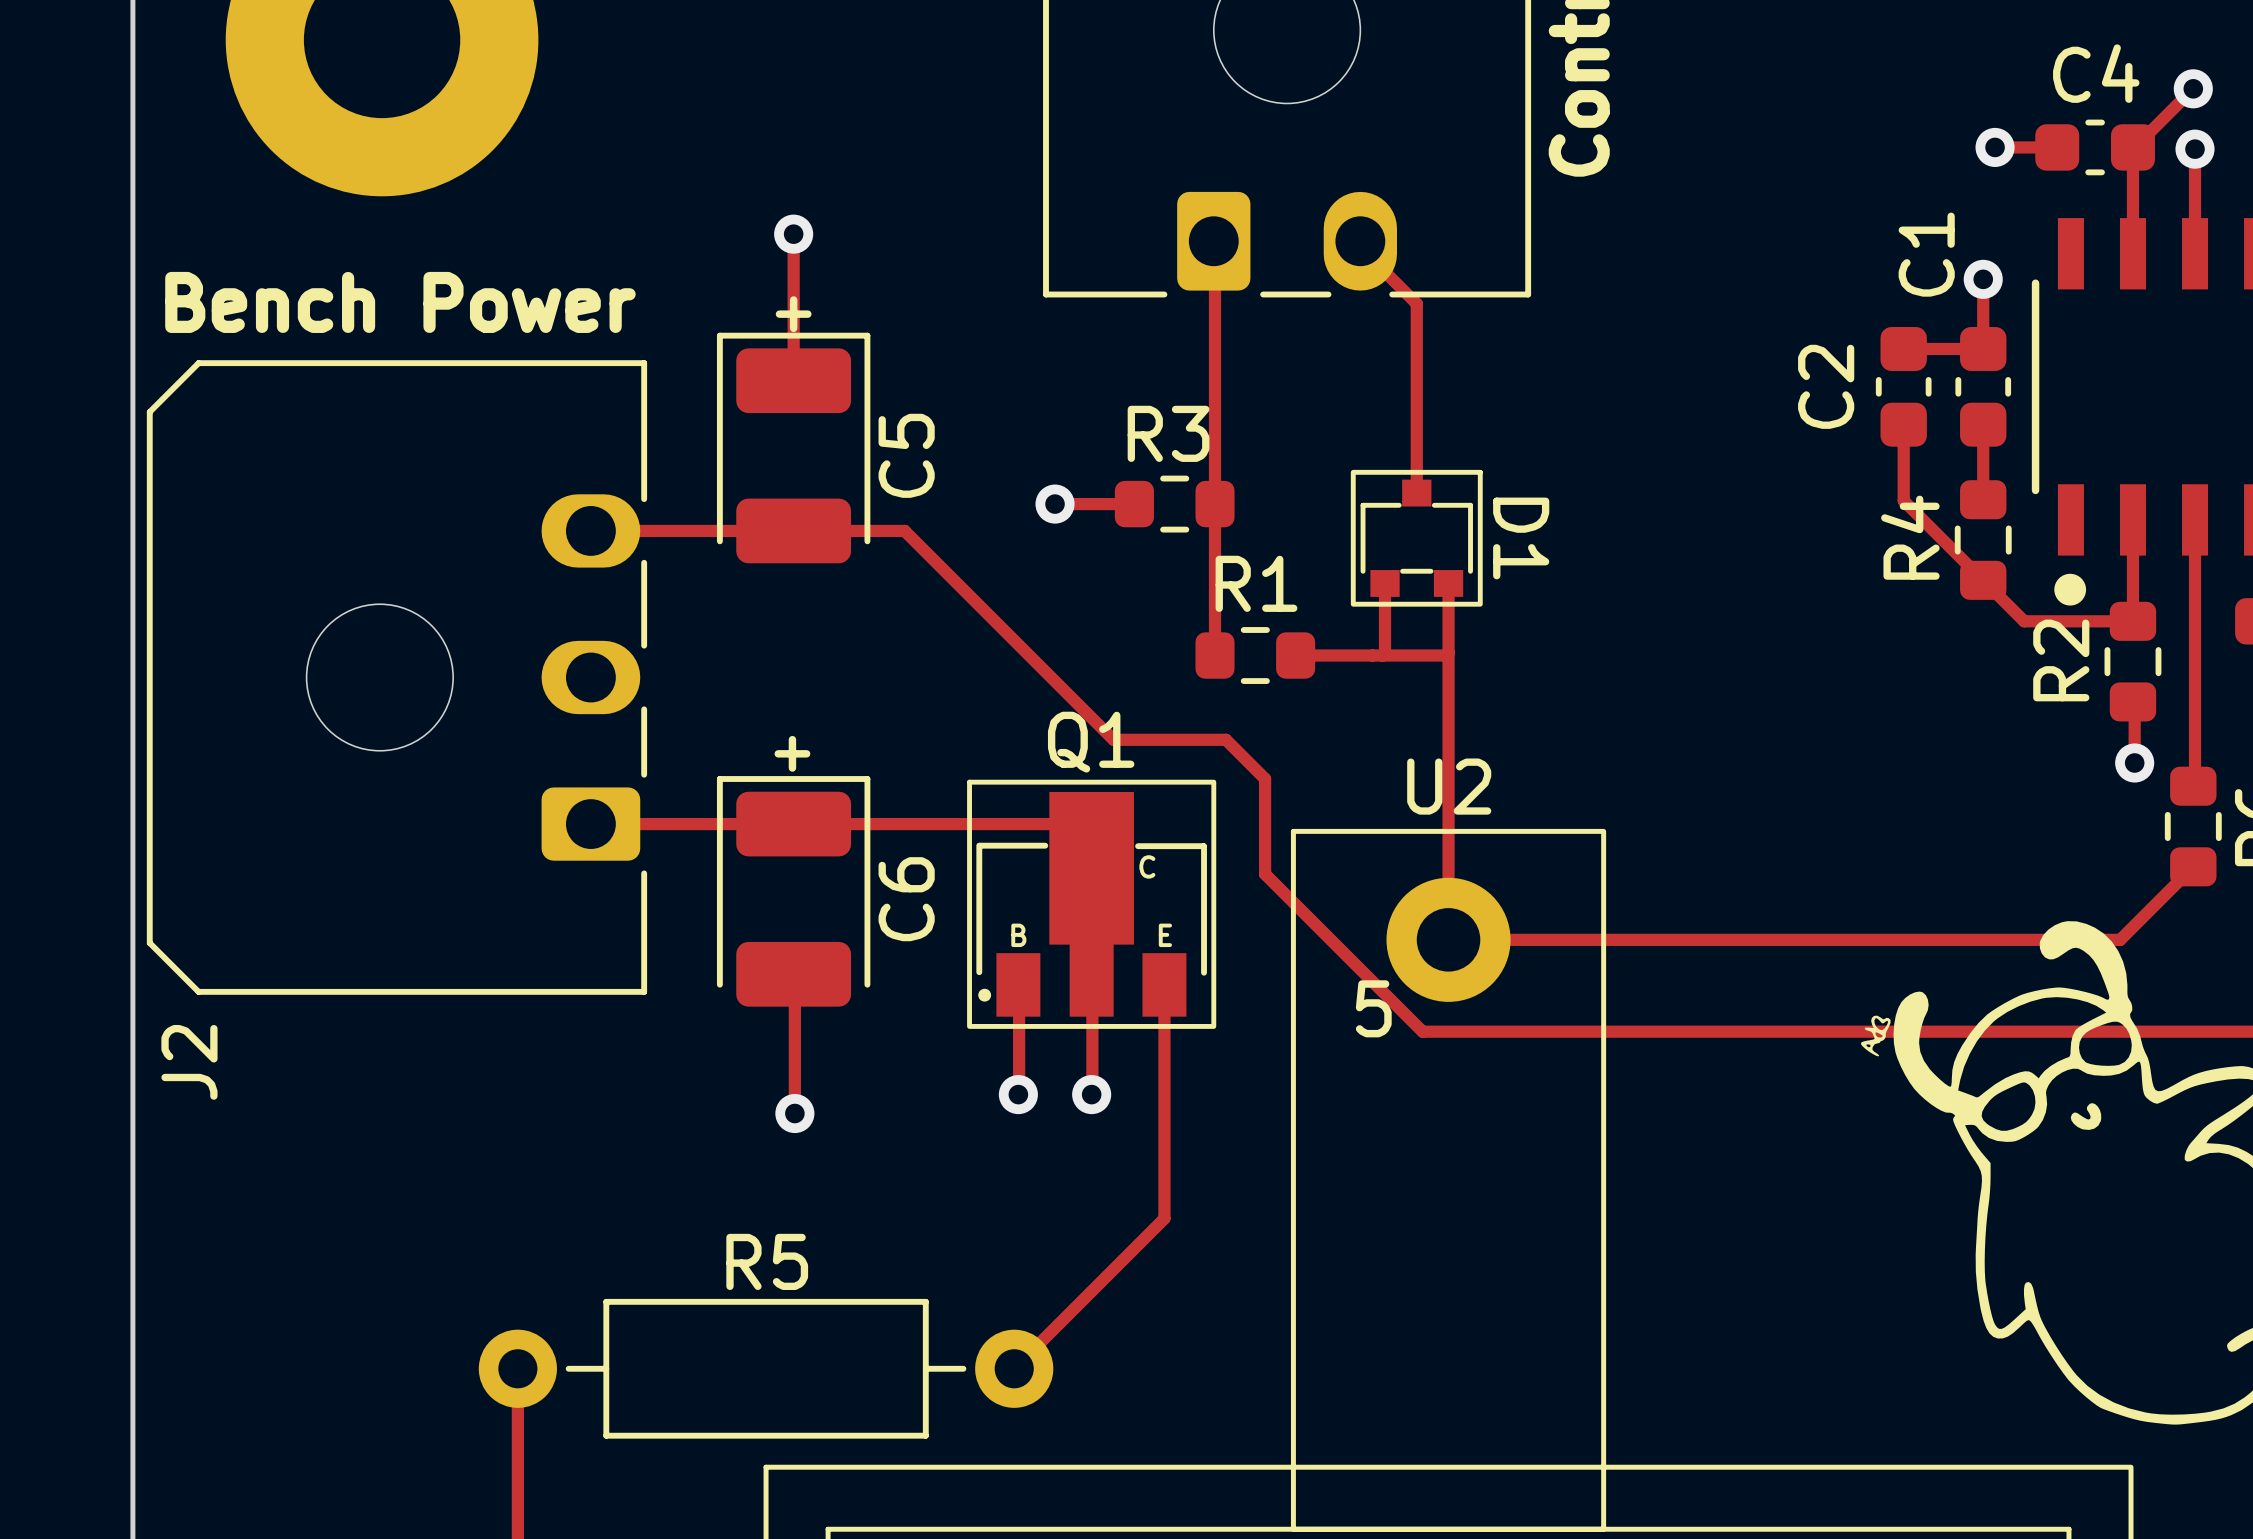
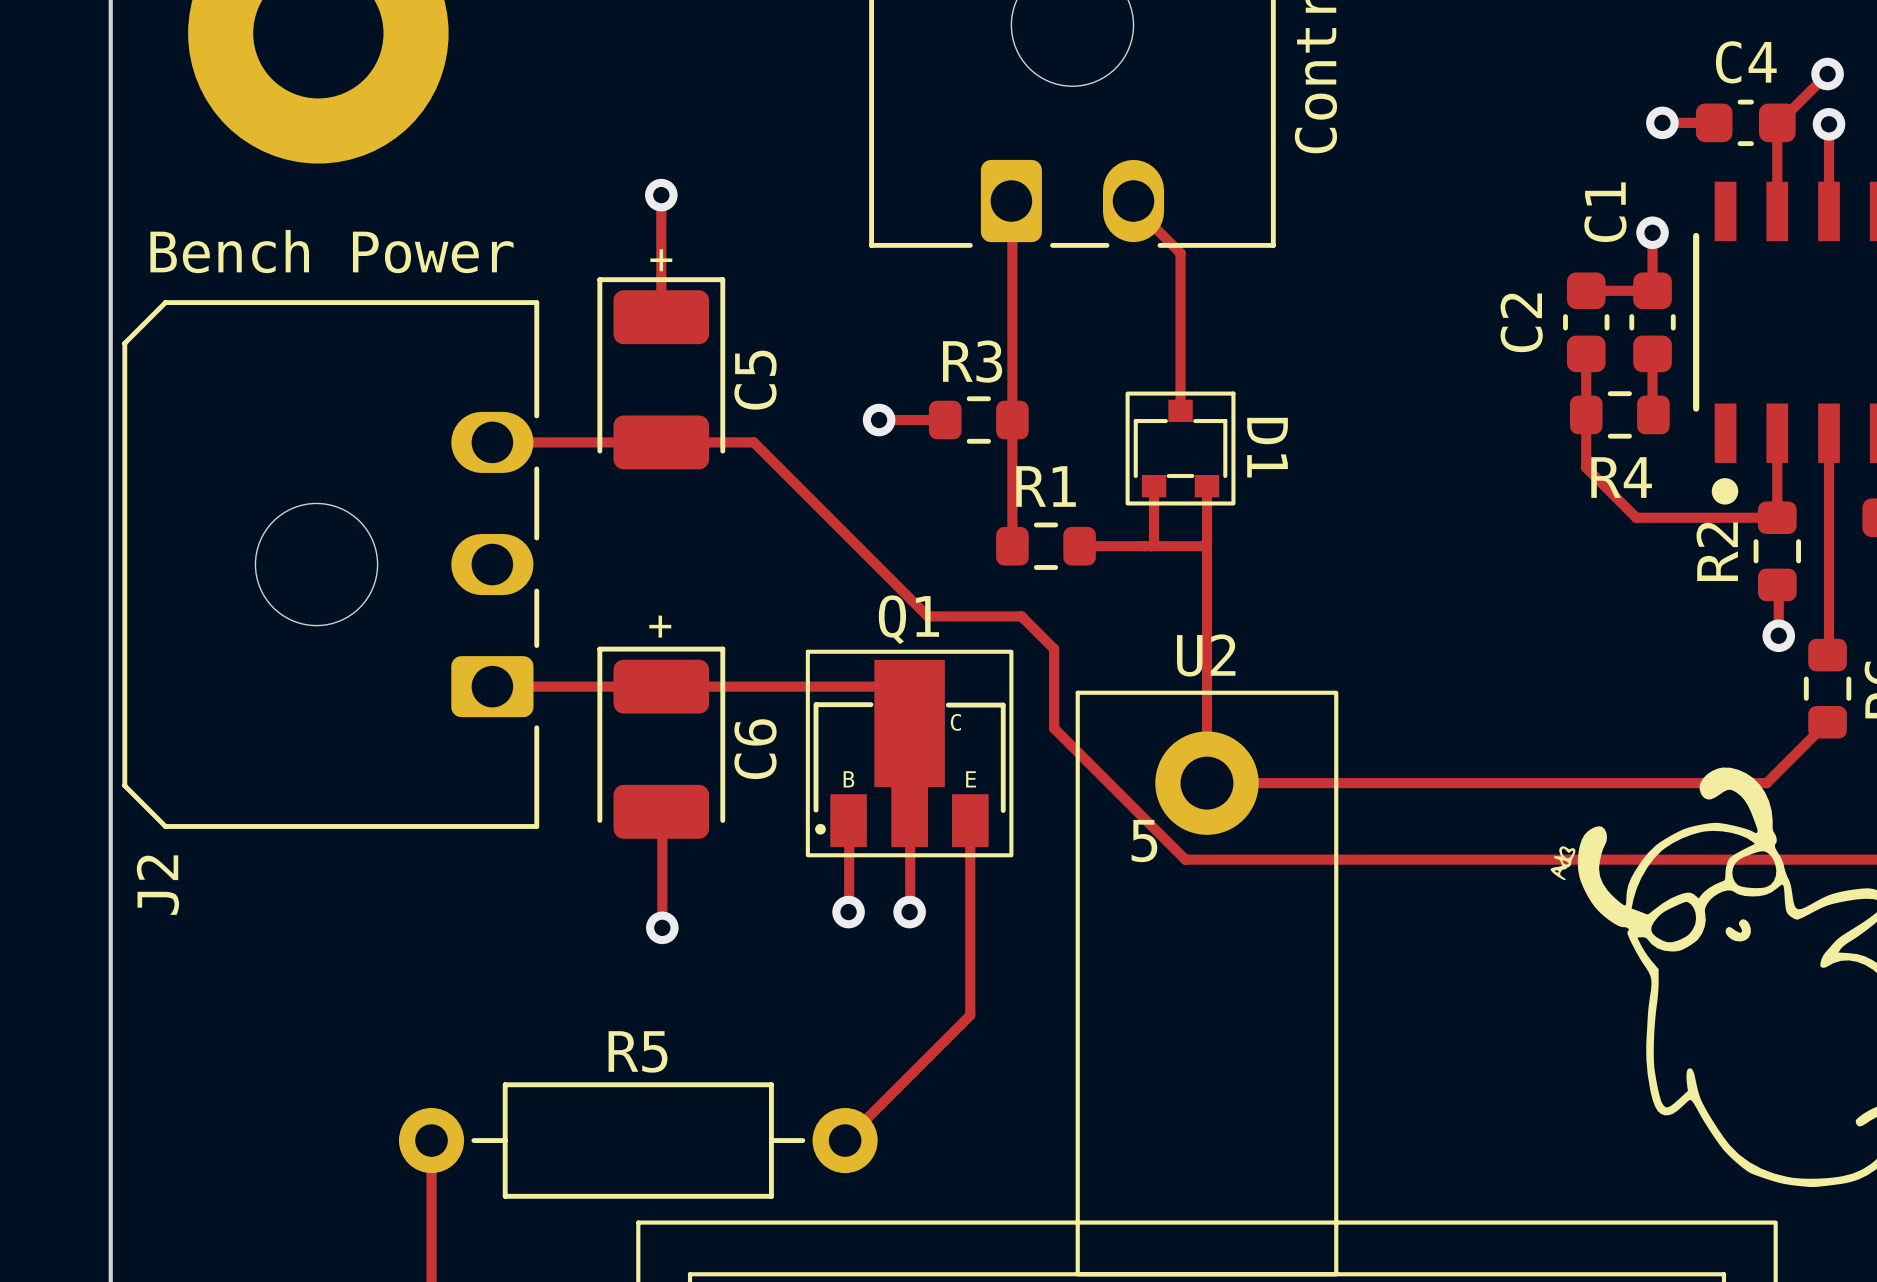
track: (1903, 500) (2024, 621) -> (1586, 424) (1586, 467) (1636, 517) (1686, 517)
R4 name position: R4 (1910, 537) -> R4 (1621, 477)
R4 rotation: 0° (1983, 540) -> 90° clockwise (1619, 414)

